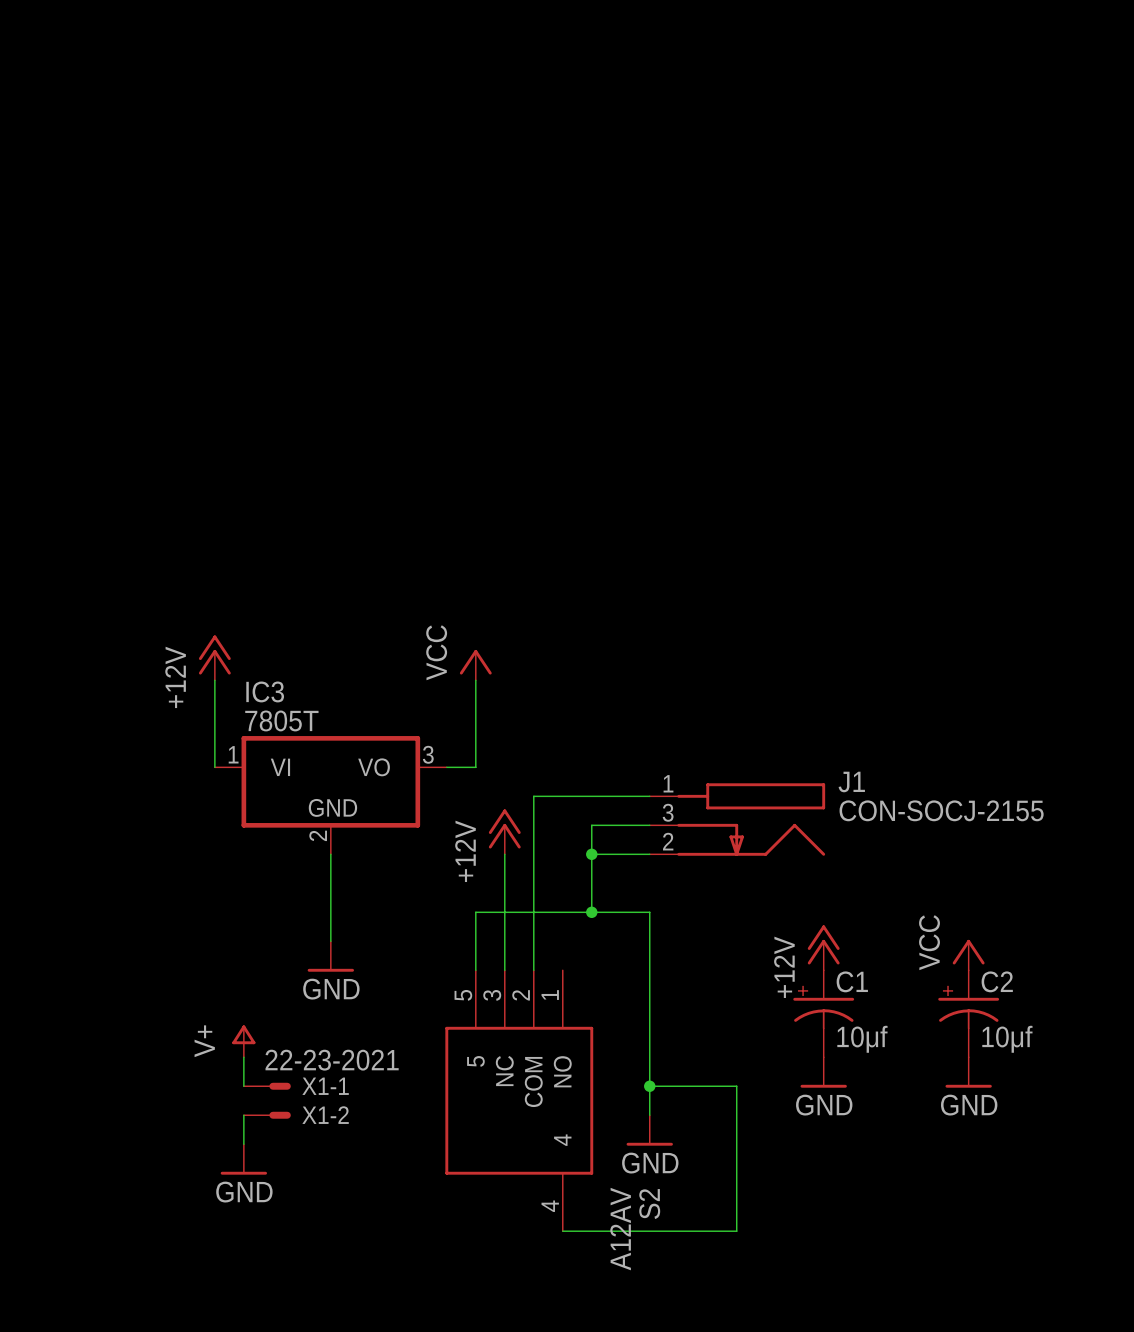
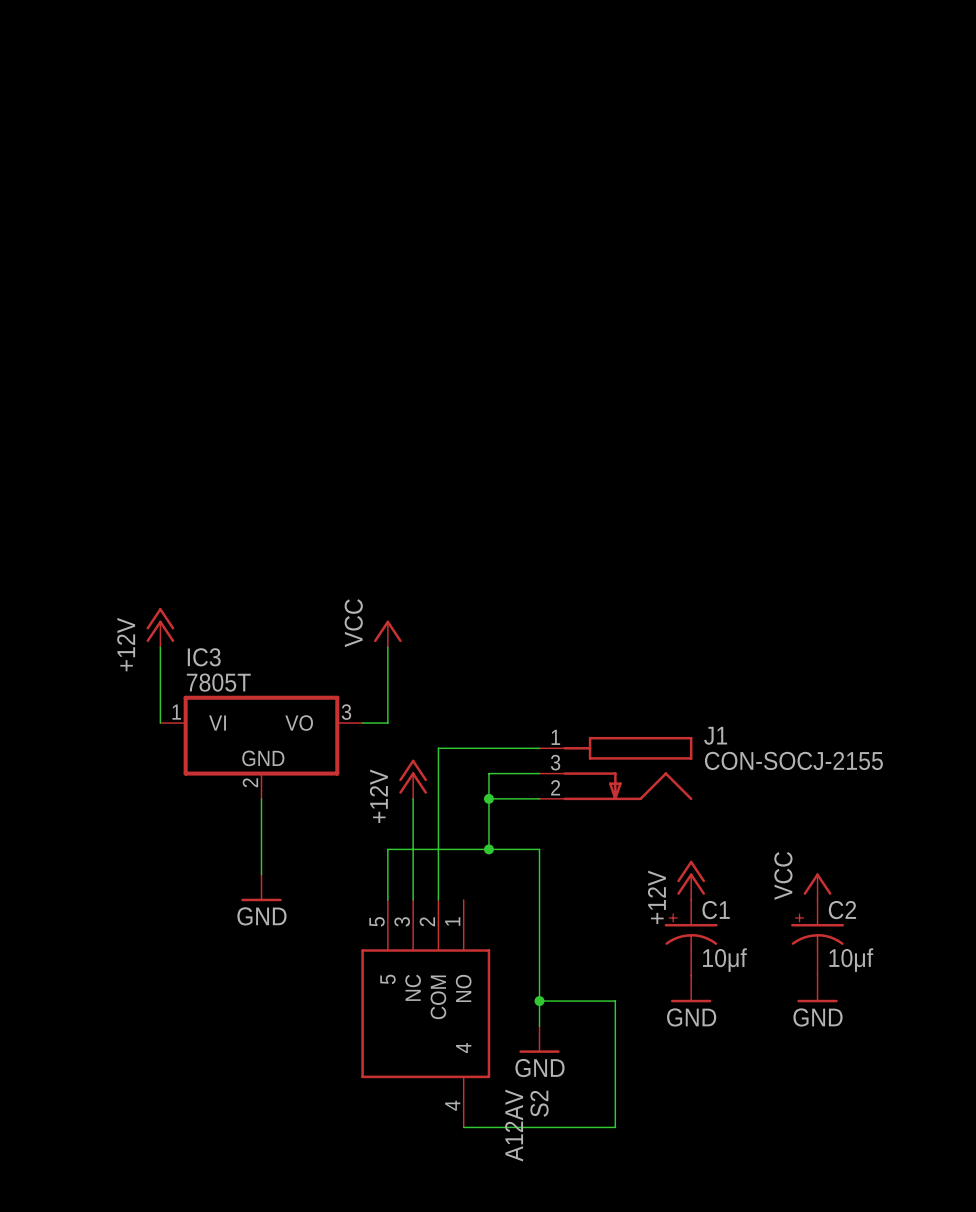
power symbol: V+ (243, 1041) -> none
wire: (243, 1057) (243, 1086) -> none
X1-1: 22-23-2021 (267, 1086) -> none
wire: (243, 1115) (243, 1144) -> none
X1-2: (267, 1115) -> none
power symbol: GND (243, 1159) -> none

